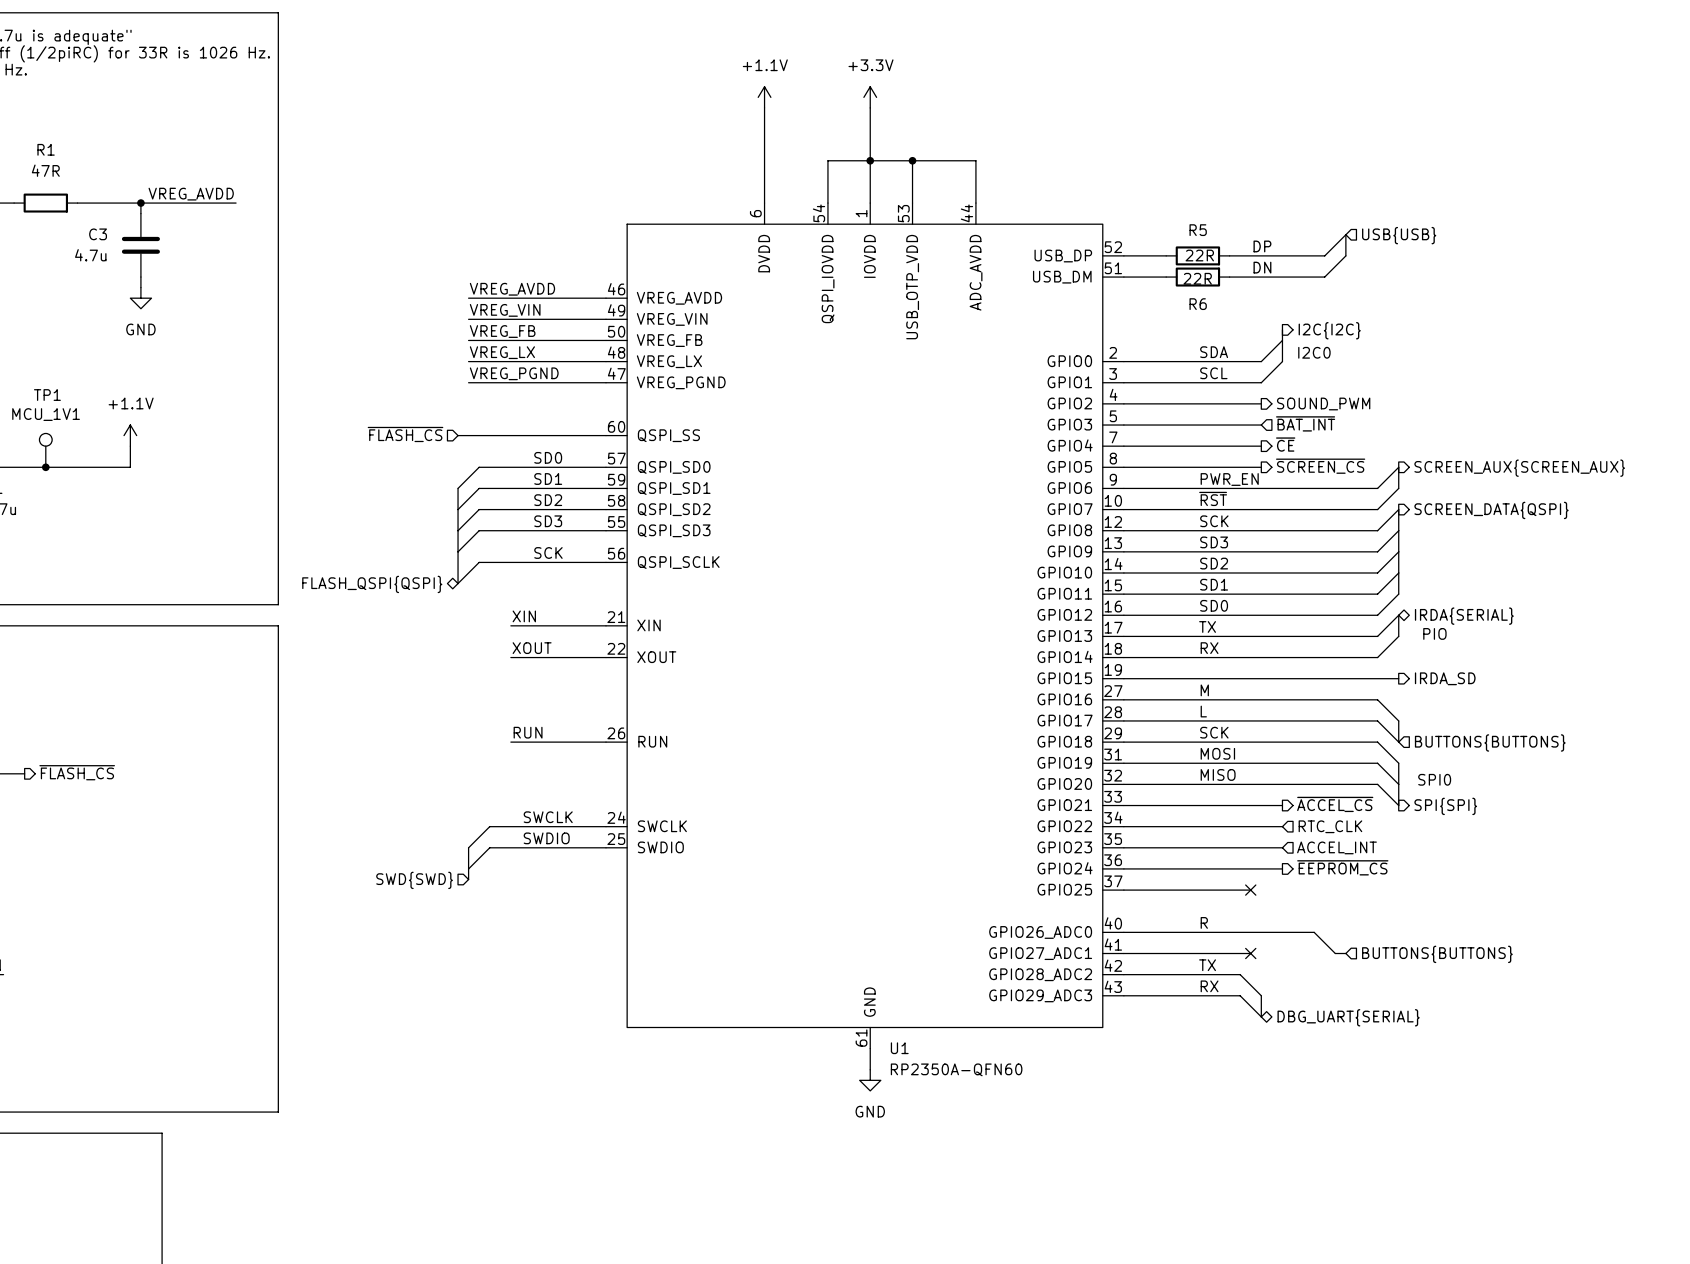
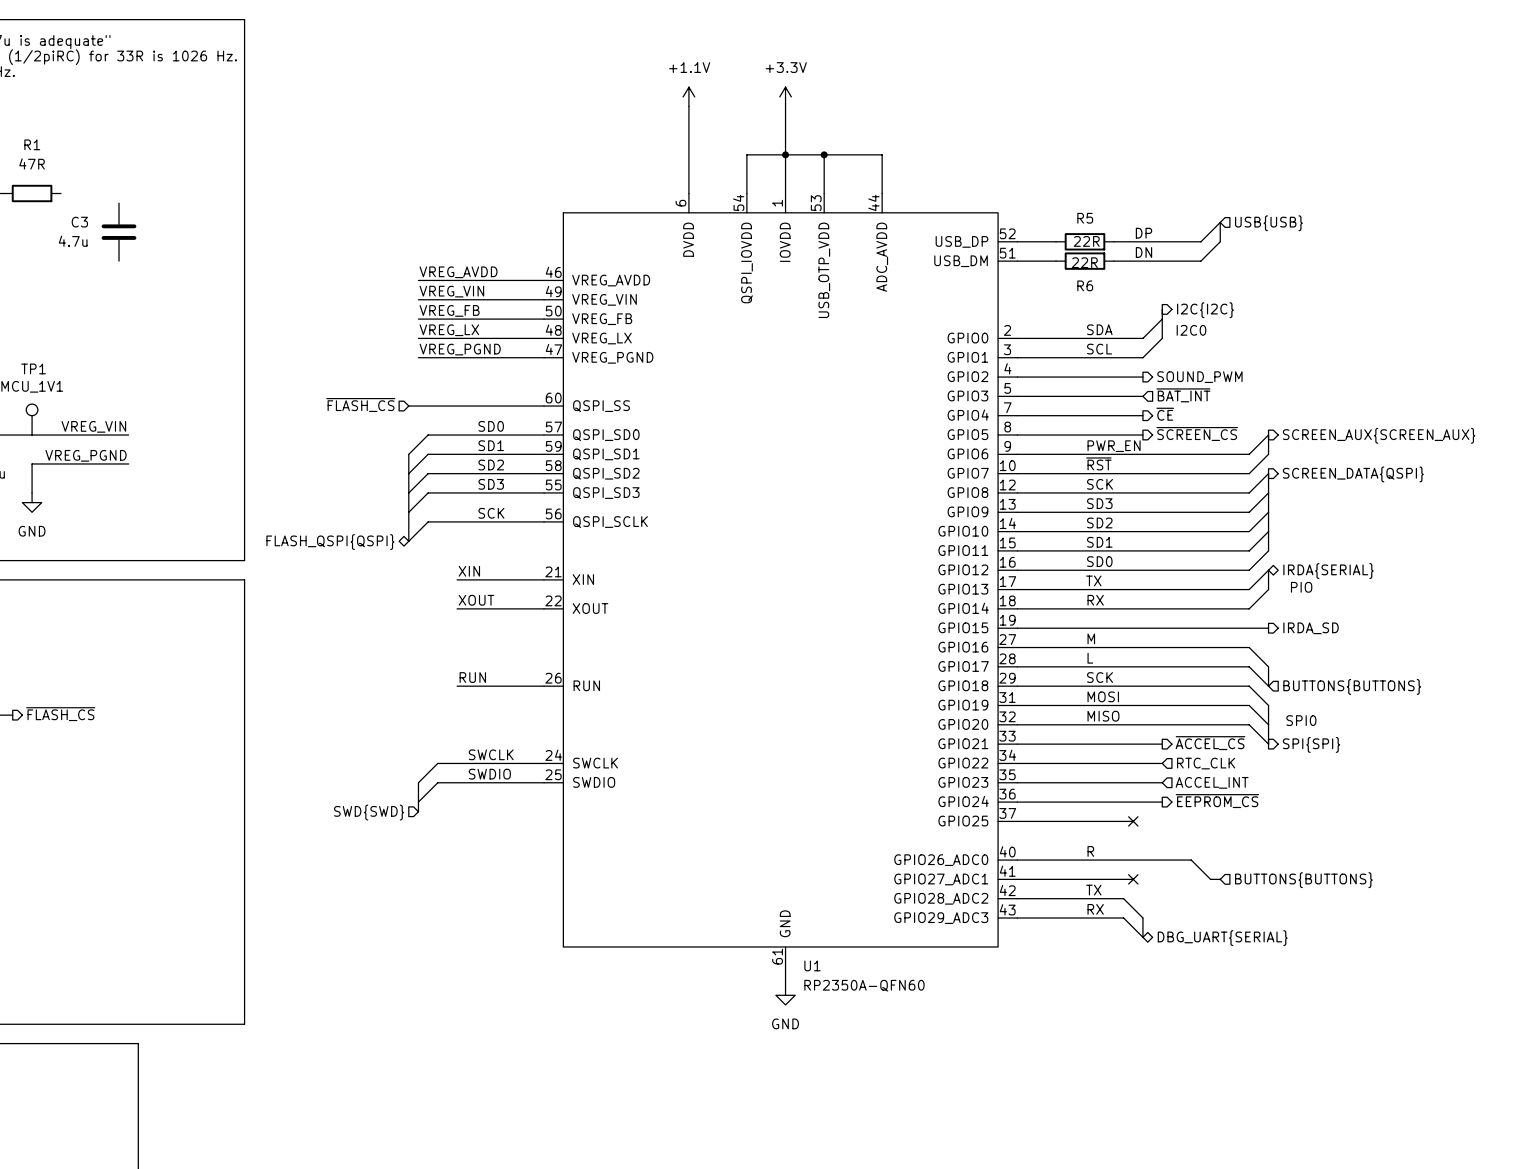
label: VREG_AVDD (191, 194) -> none
wire: (77, 203) (236, 203) -> none
wire: (140, 203) (140, 213) -> none
junction: (140, 203) -> none
wire: (140, 277) (140, 287) -> none
power symbol: GND (140, 298) -> none
power symbol: +1.1V (130, 435) -> none
wire: (130, 446) (130, 467) -> (128, 435) (109, 435)
label: none -> VREG_VIN (93, 426)
junction: (45, 467) -> none
label: none -> VREG_PGND (86, 455)
wire: none -> (128, 463) (32, 463) (32, 492)
power symbol: none -> GND (32, 502)

